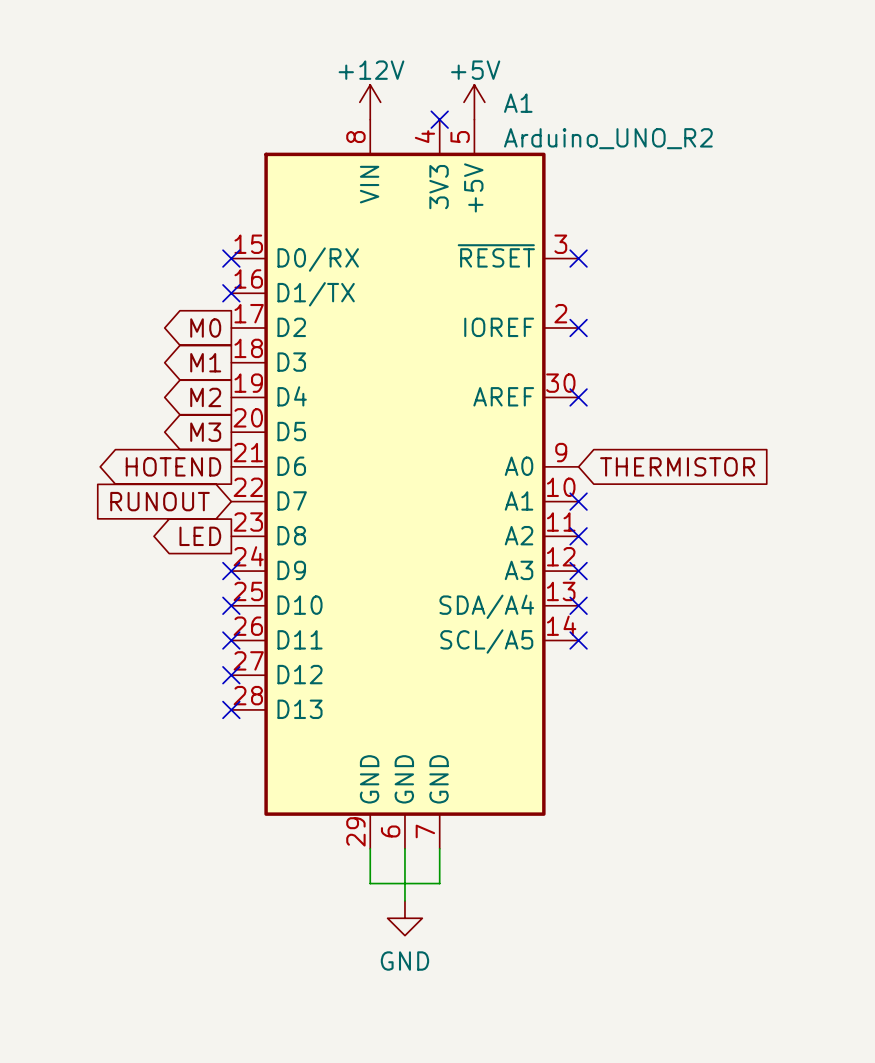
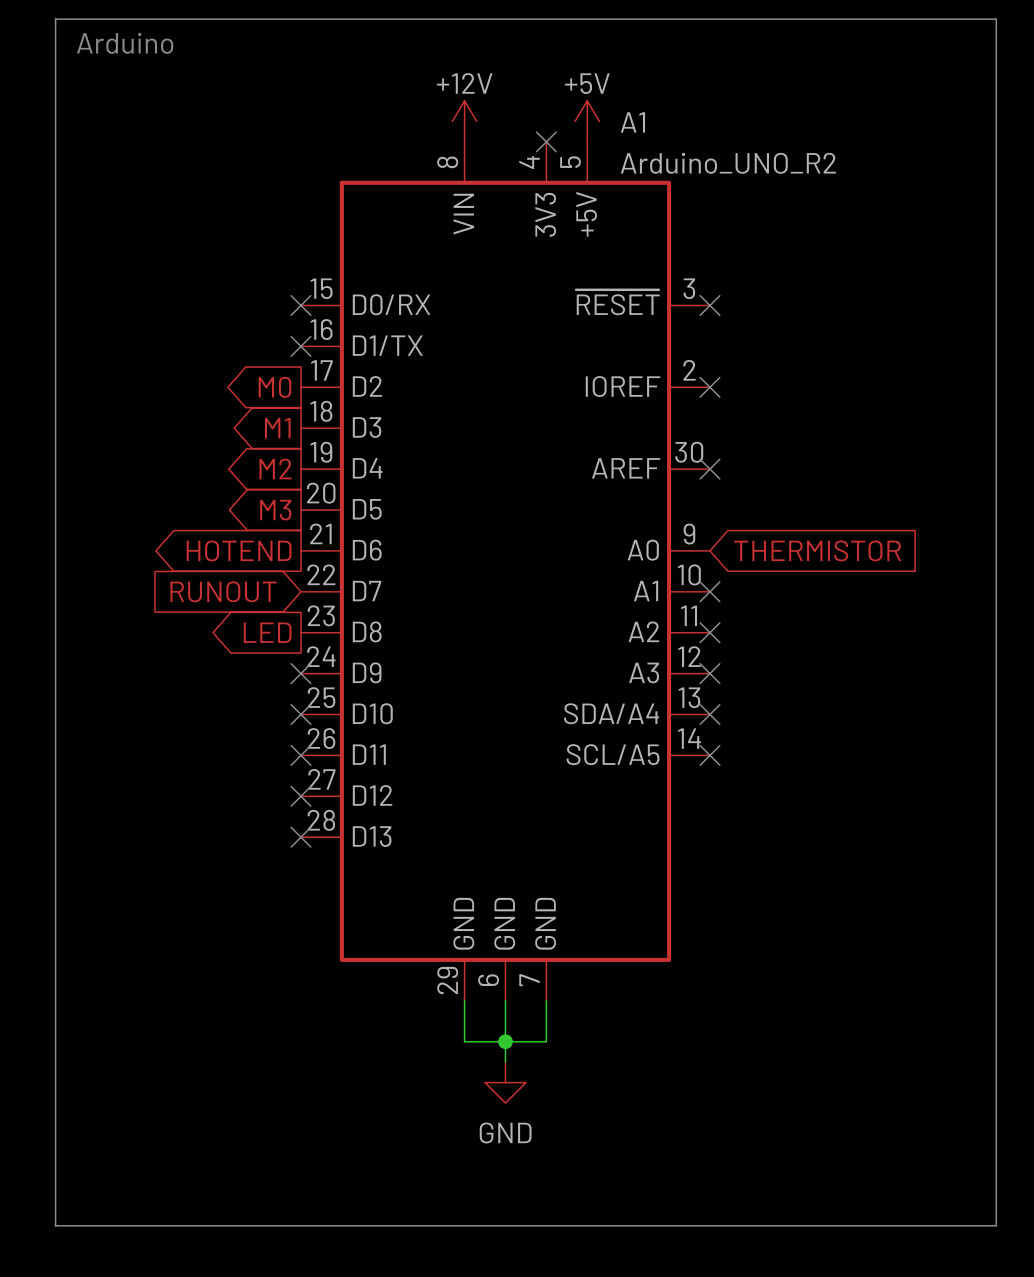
line: none -> (55, 19) (55, 1225) (996, 1225) (996, 19) (55, 19)
text: none -> Arduino (125, 43)
junction: none -> (505, 1041)

